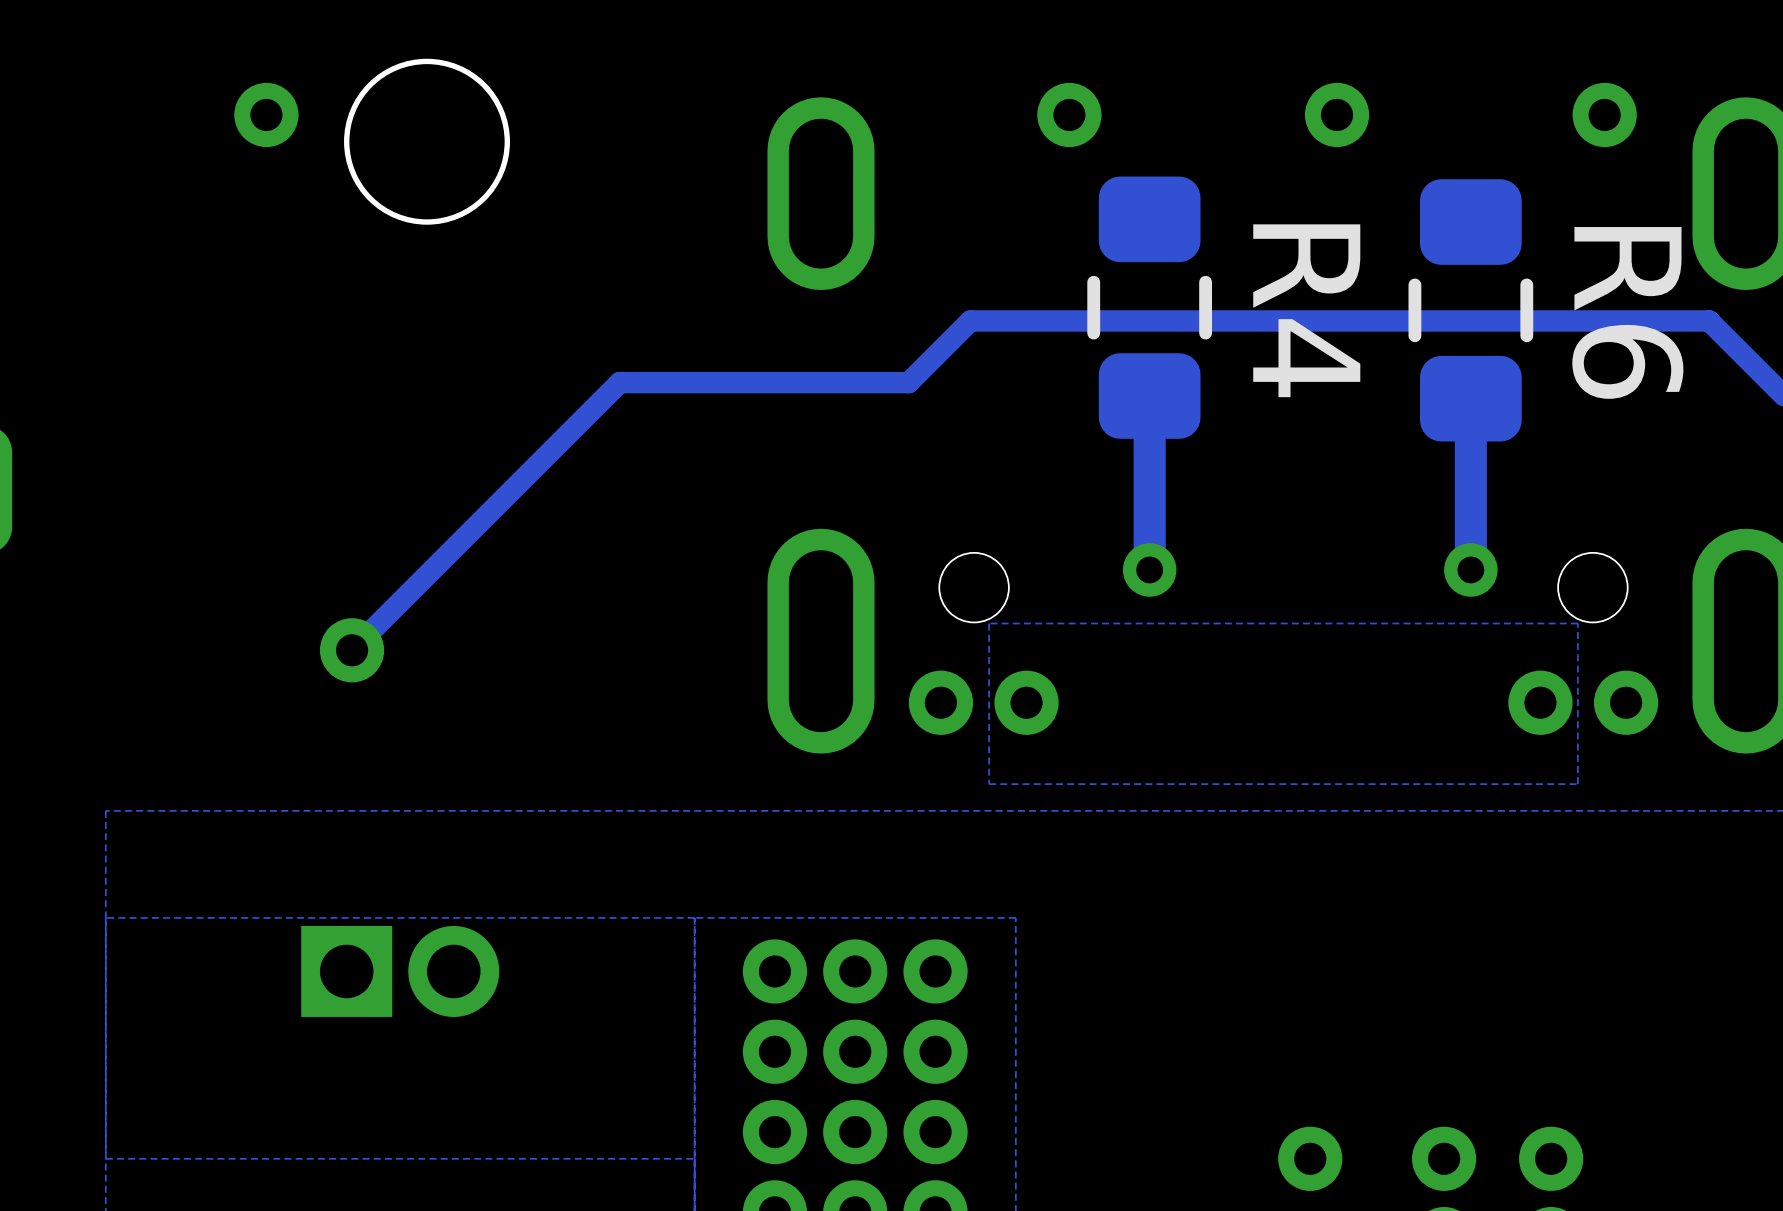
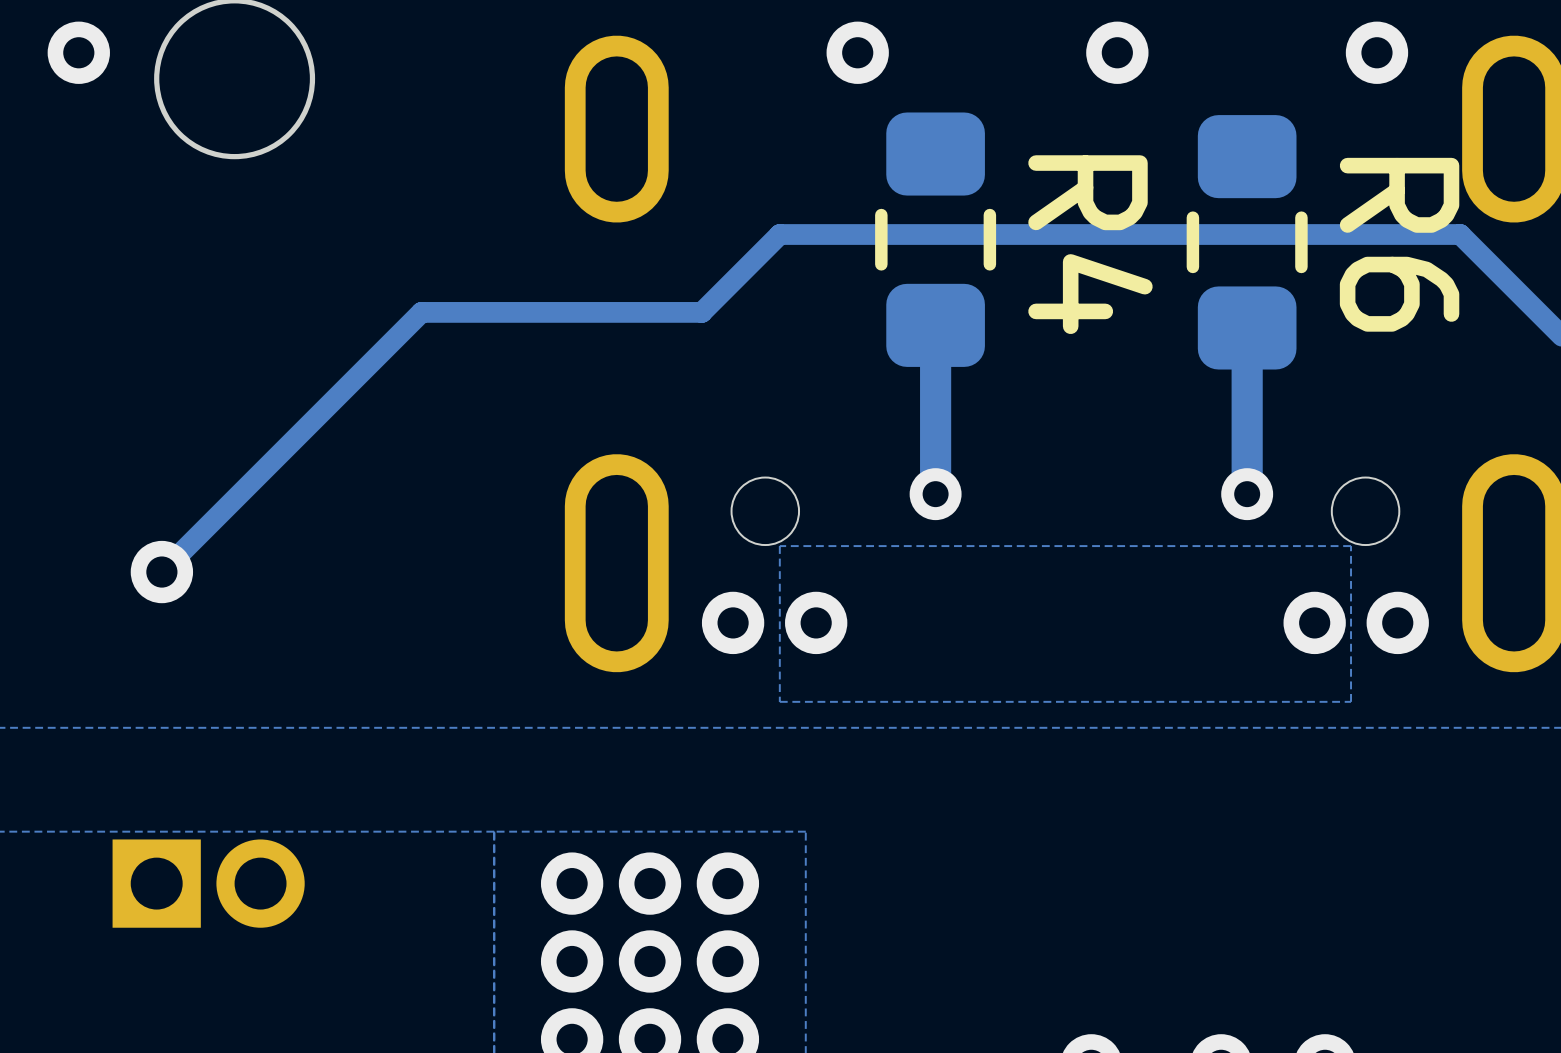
track: (1709, 320) (970, 320) -> (1478, 252) (1460, 234) (779, 234) (761, 252)

